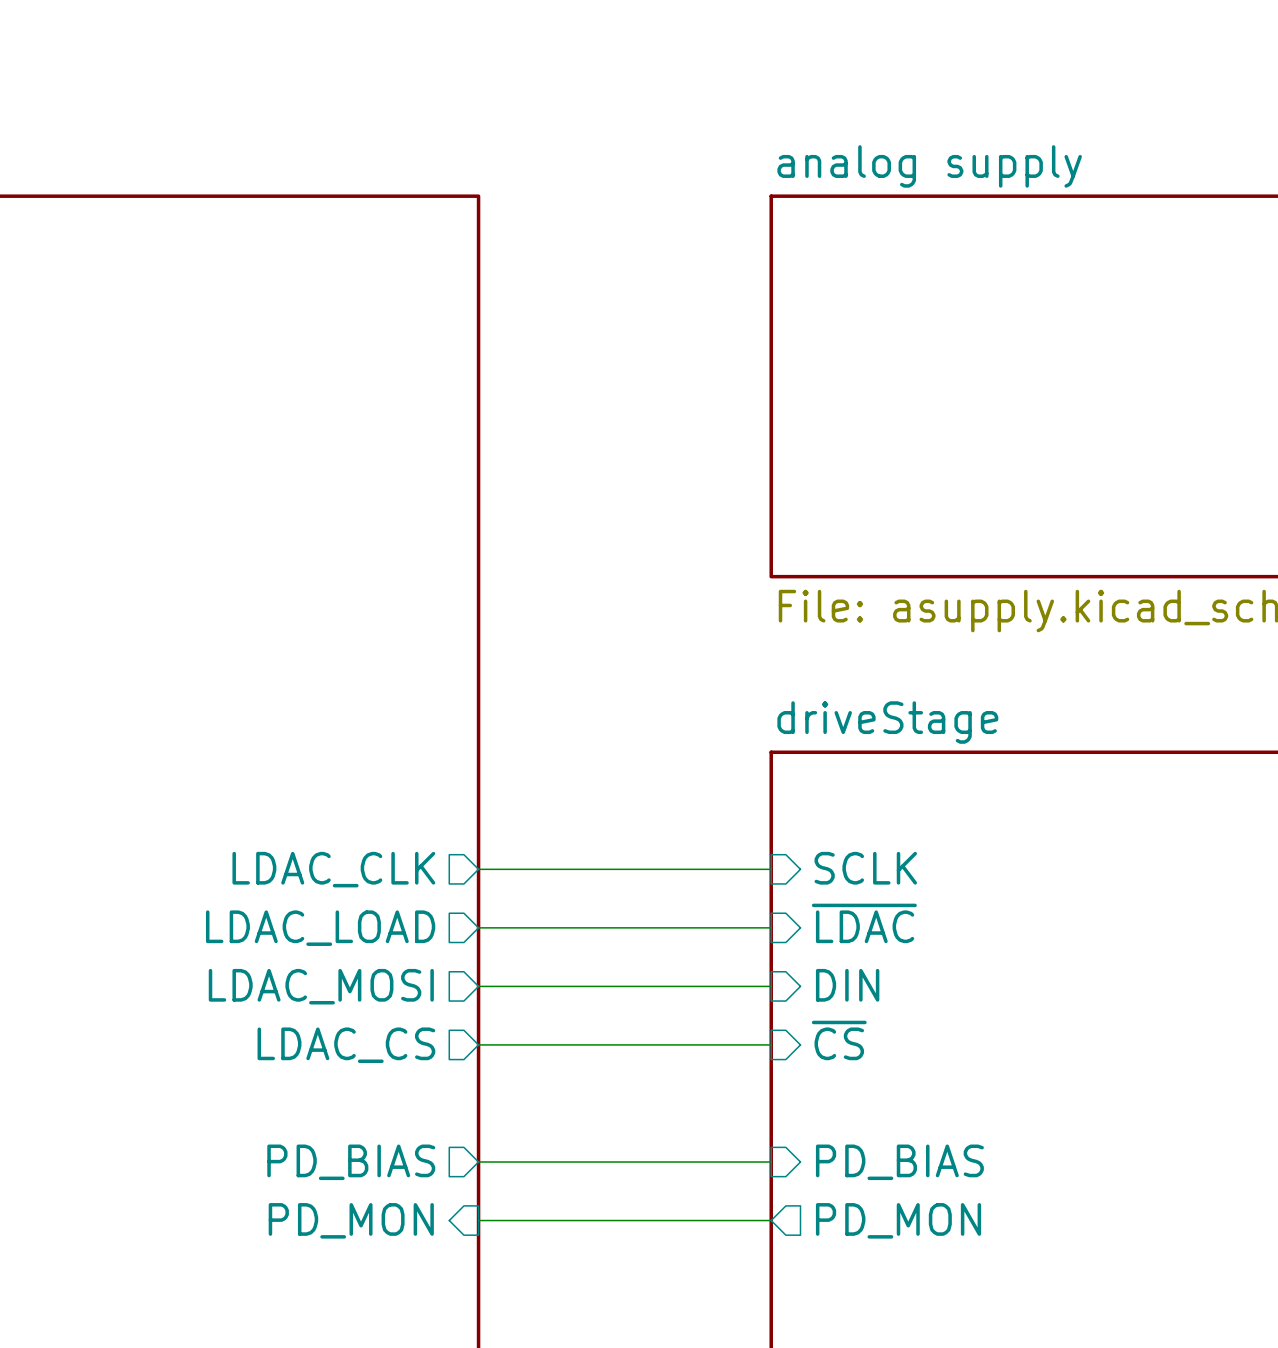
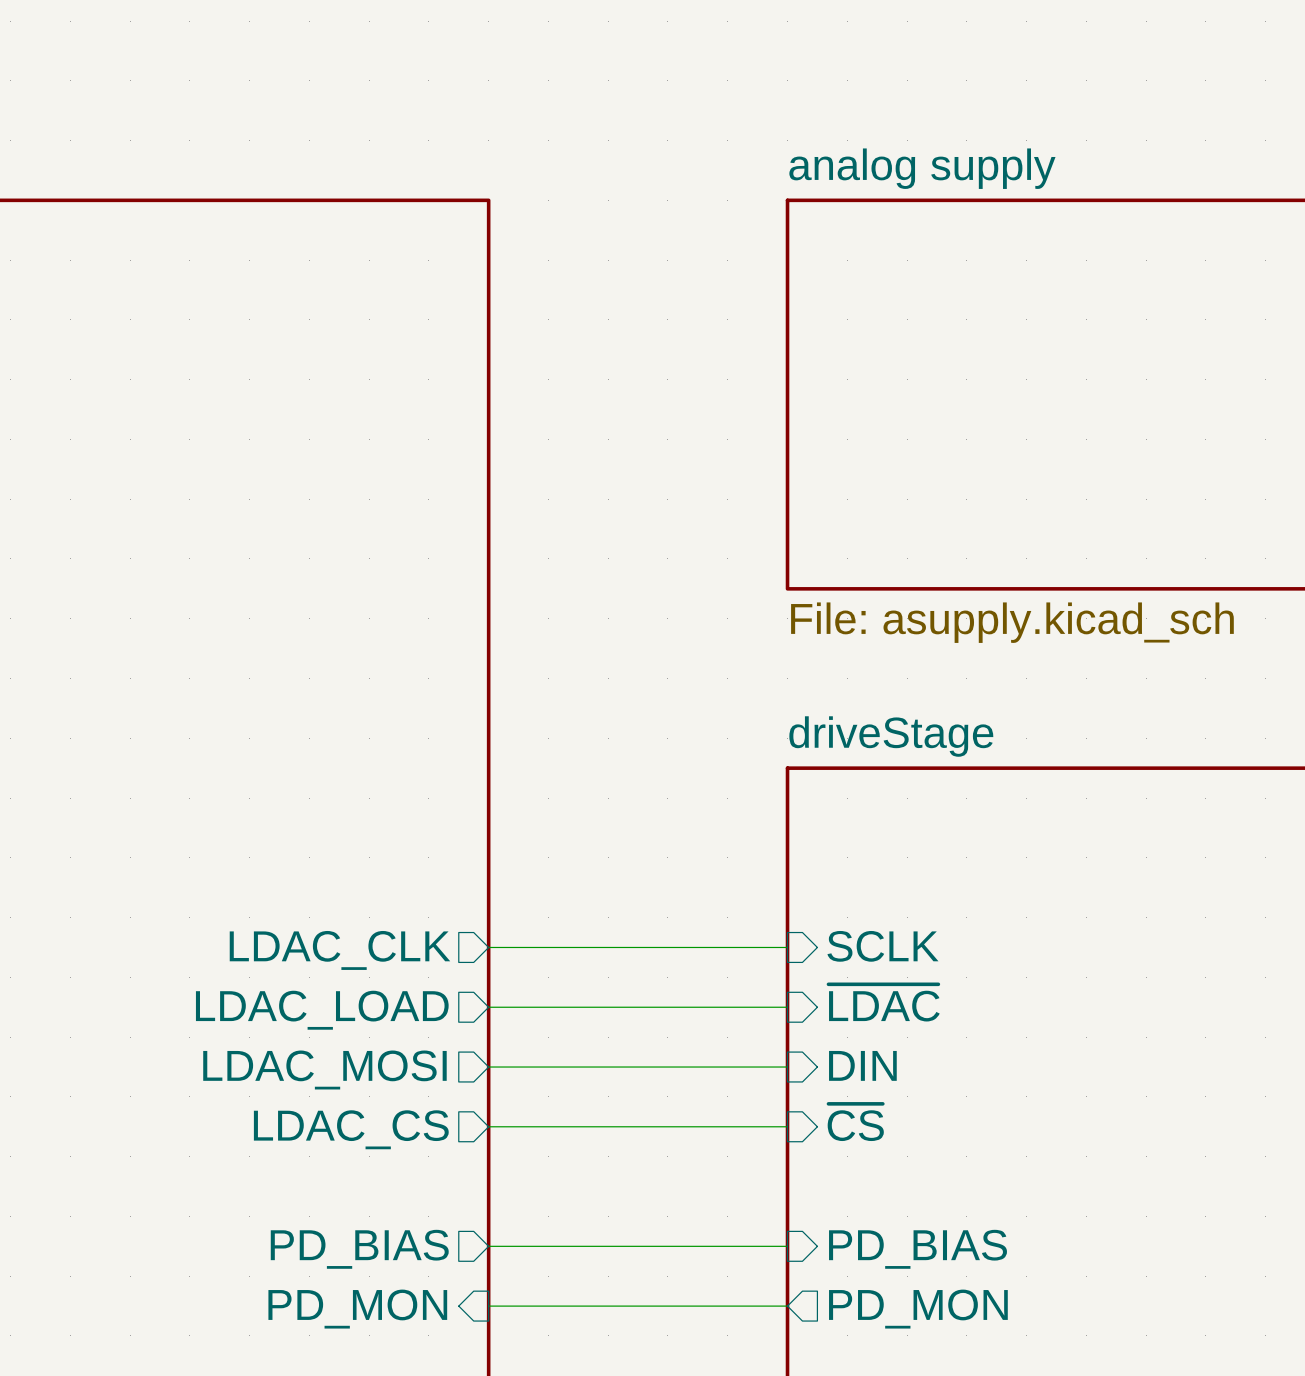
sheet pin: SCLK (865, 868) -> none
sheet pin: LDAC_CLK (333, 869) -> none
wire: (478, 869) (771, 869) -> (488, 1306) (787, 1306)
sheet pin: ~{LDAC} (864, 923) -> SCLK (882, 946)
sheet pin: LDAC_LOAD (320, 928) -> LDAC_CLK (339, 950)
sheet pin: DIN (847, 985) -> ~{LDAC} (884, 1002)
sheet pin: LDAC_MOSI (321, 986) -> LDAC_LOAD (322, 1010)
sheet pin: ~{CS} (839, 1040) -> DIN (862, 1065)
sheet pin: LDAC_CS (346, 1045) -> LDAC_MOSI (324, 1069)
sheet pin: none -> ~{CS} (855, 1122)
sheet pin: none -> LDAC_CS (351, 1129)
sheet pin: PD_BIAS (351, 1162) -> none
wire: (478, 1162) (771, 1162) -> (488, 1126) (787, 1126)
sheet pin: PD_BIAS (899, 1162) -> none
sheet pin shape: input (351, 1220) -> output (359, 1249)
sheet pin: PD_MON (351, 1220) -> PD_BIAS (359, 1249)
sheet pin shape: output (898, 1220) -> input (918, 1249)
sheet pin: PD_MON (898, 1220) -> PD_BIAS (918, 1249)
sheet pin: none -> PD_MON (357, 1309)
sheet pin: none -> PD_MON (918, 1309)

